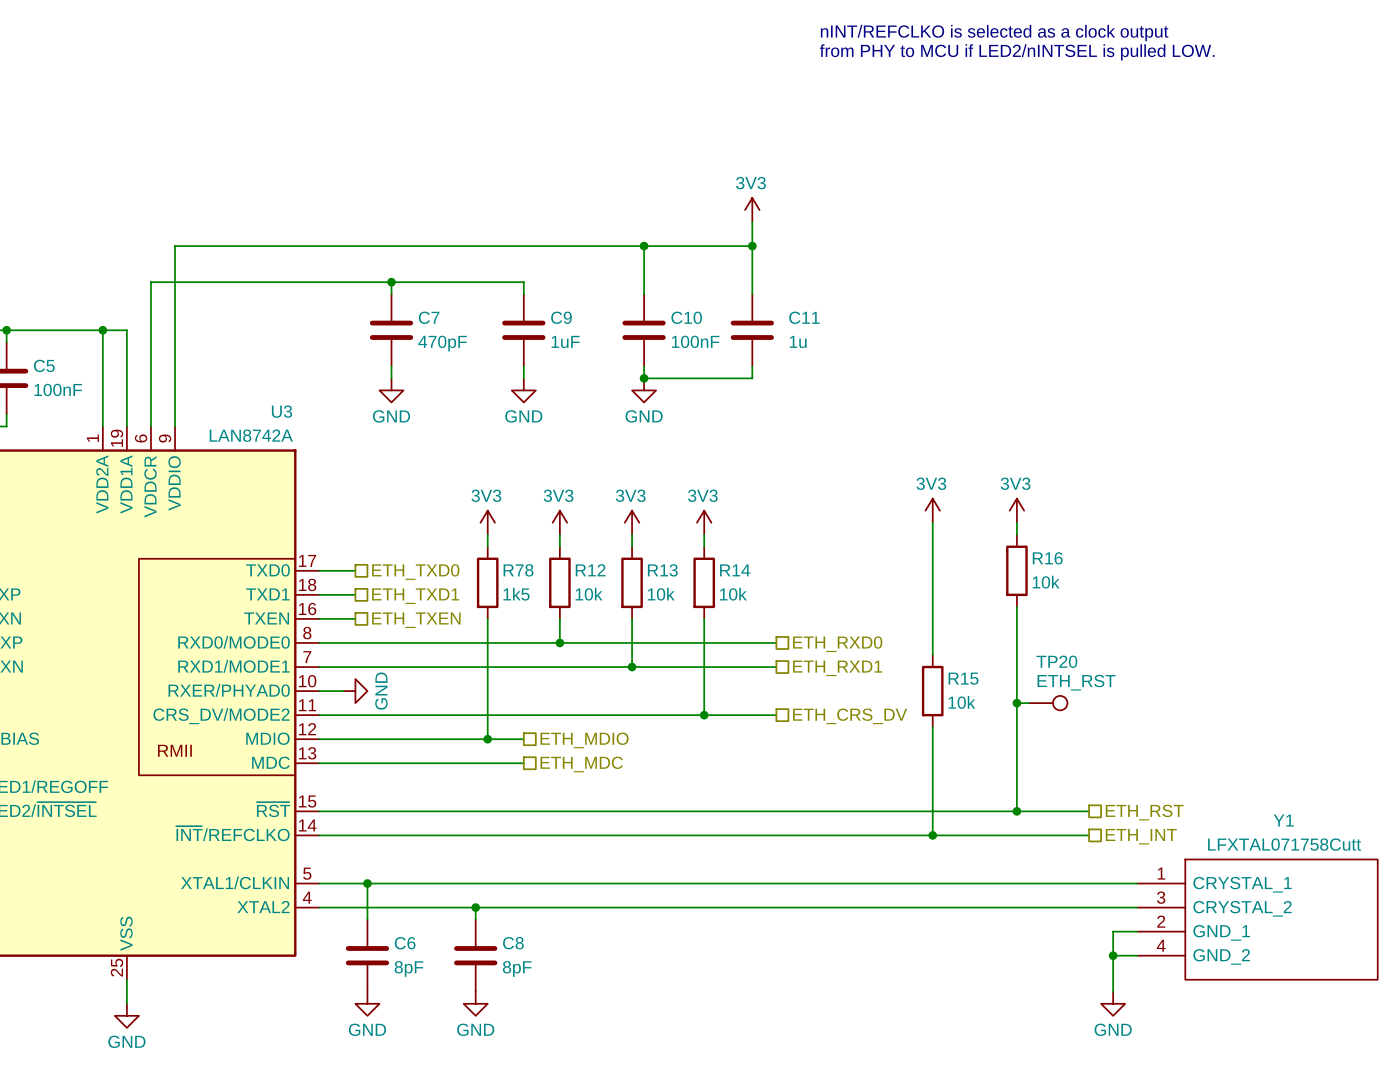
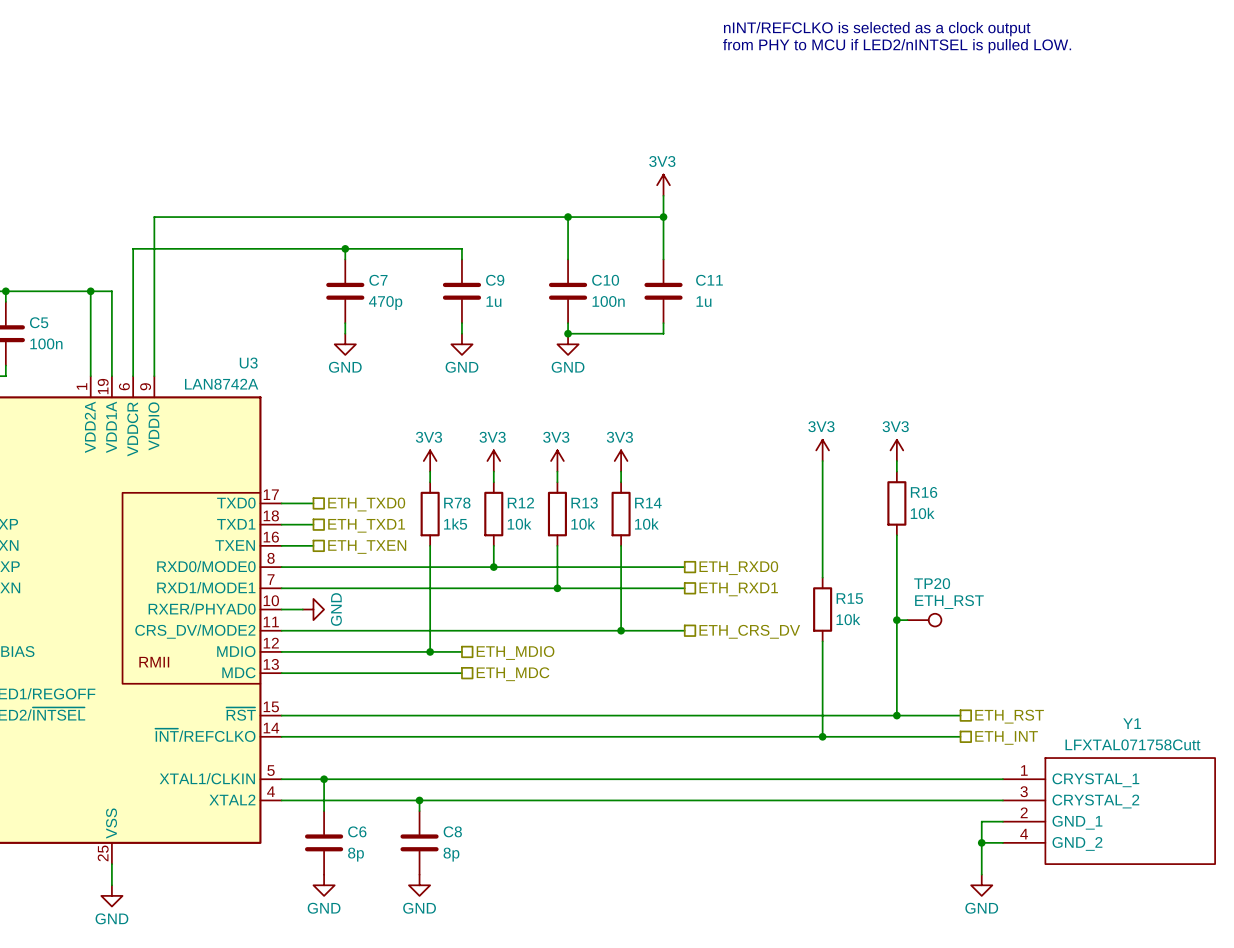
C9 value: 1uF (565, 341) -> 1u (493, 301)
C10 value: 100nF (695, 341) -> 100n (608, 301)
C7 value: 470pF (442, 343) -> 470p (385, 303)
C5 value: 100nF (58, 389) -> 100n (46, 343)
C6 value: 8pF (409, 968) -> 8p (356, 854)
C8 value: 8pF (517, 968) -> 8p (451, 854)

